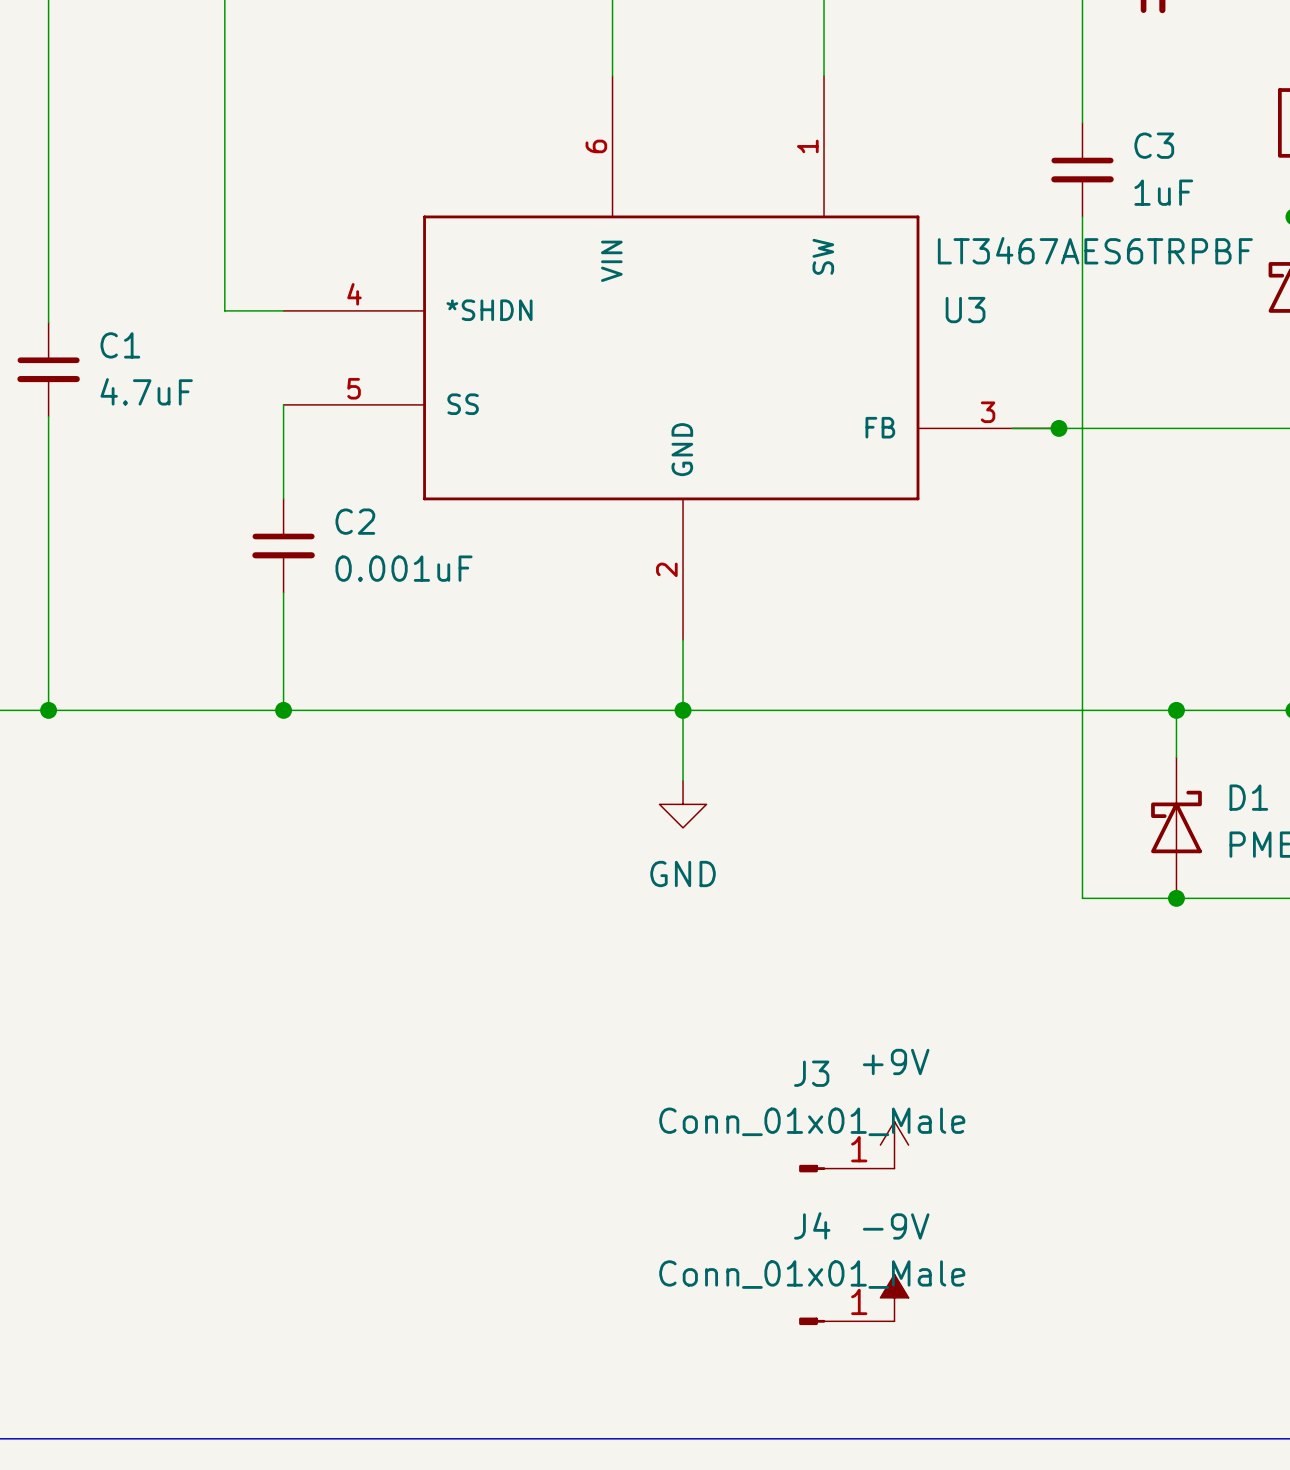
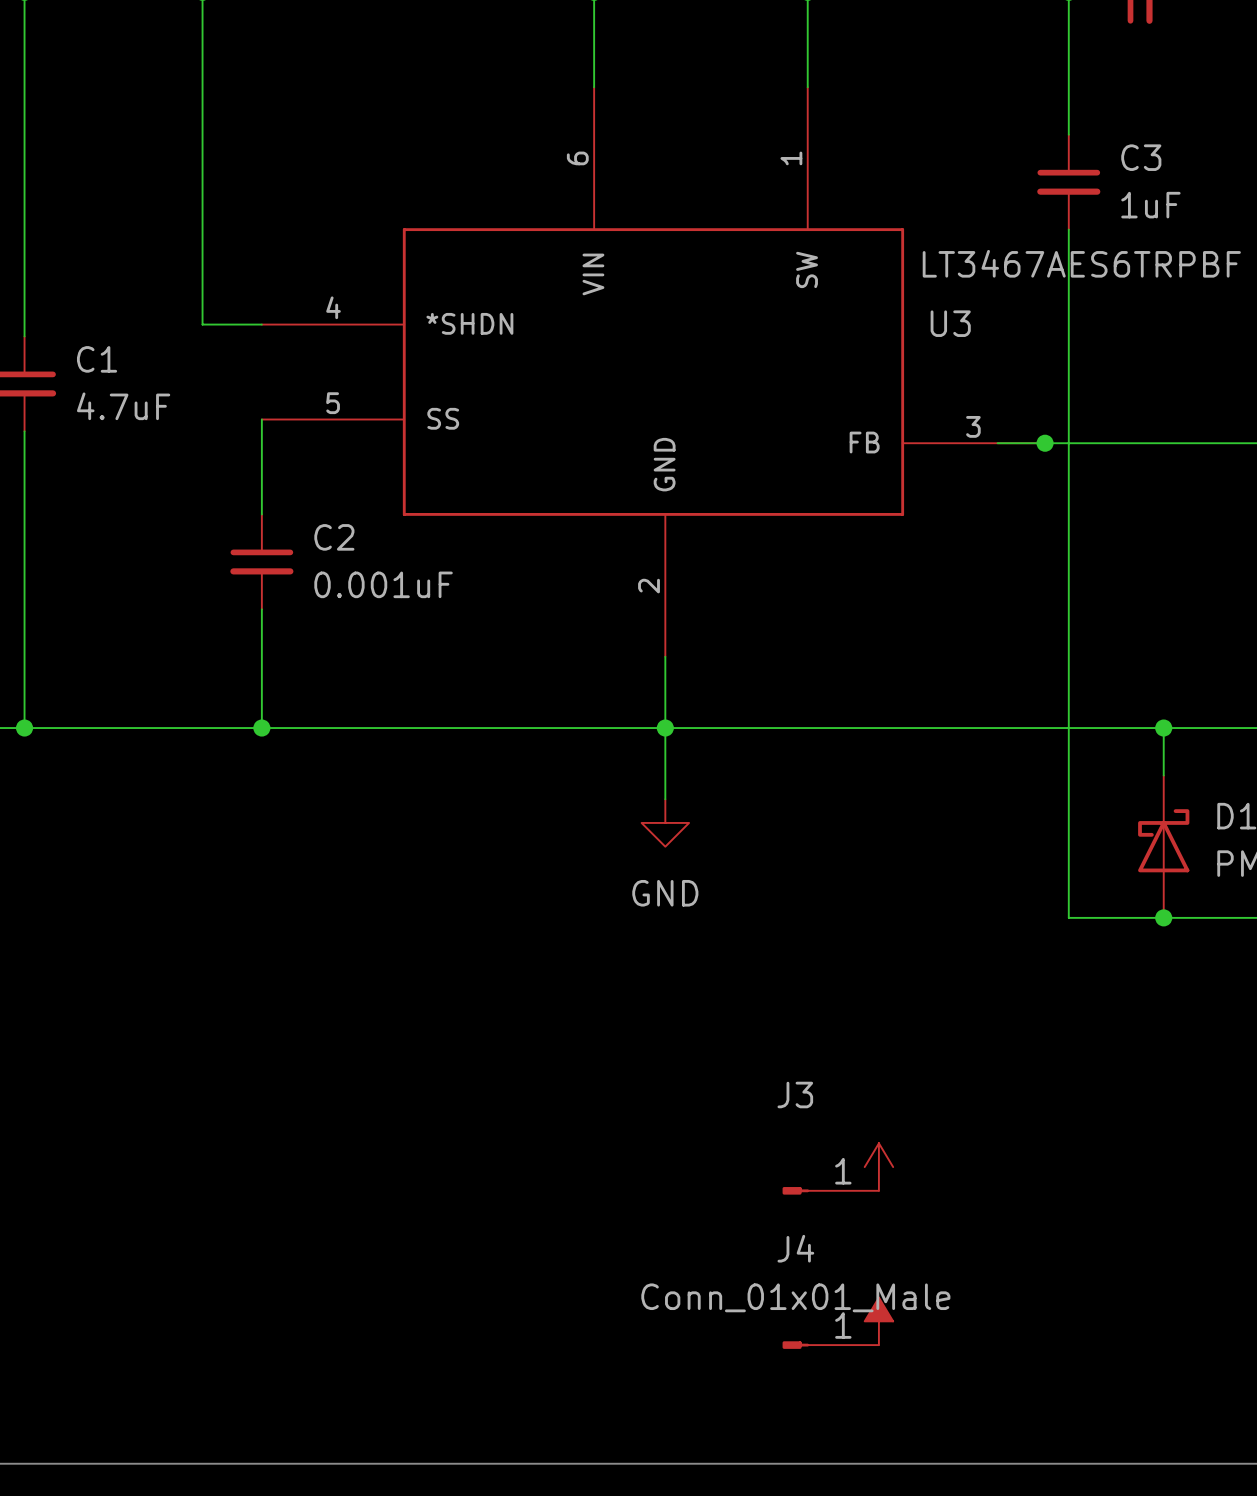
power symbol text: +9V (896, 1061) -> none
J3 value: Conn_01x01_Male (812, 1121) -> none
power symbol text: -9V (896, 1226) -> none

